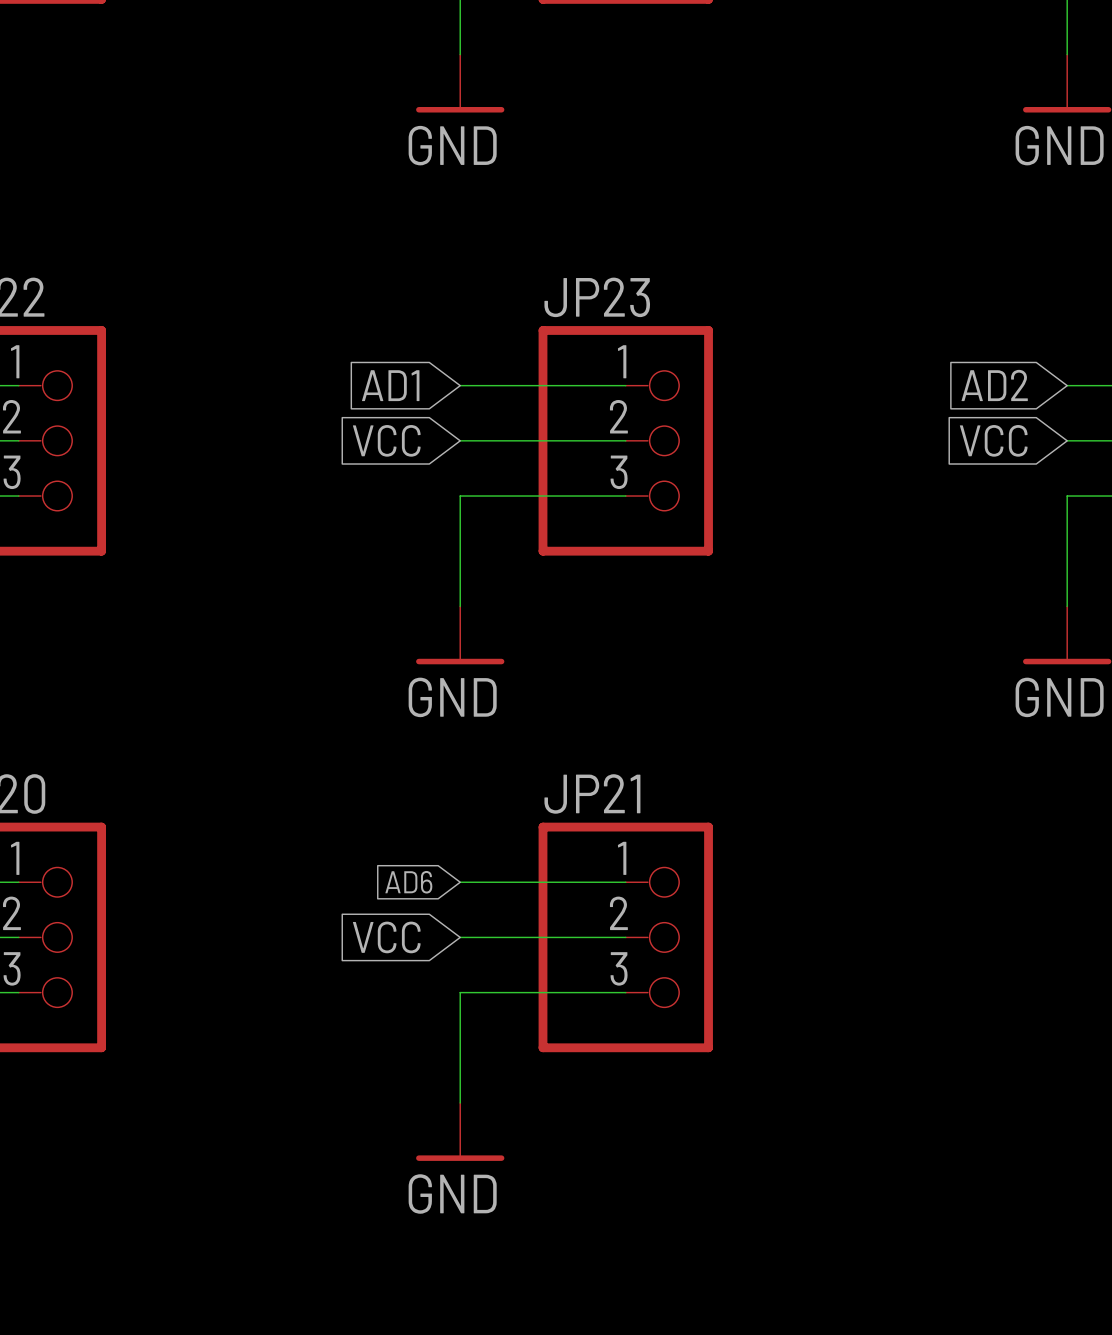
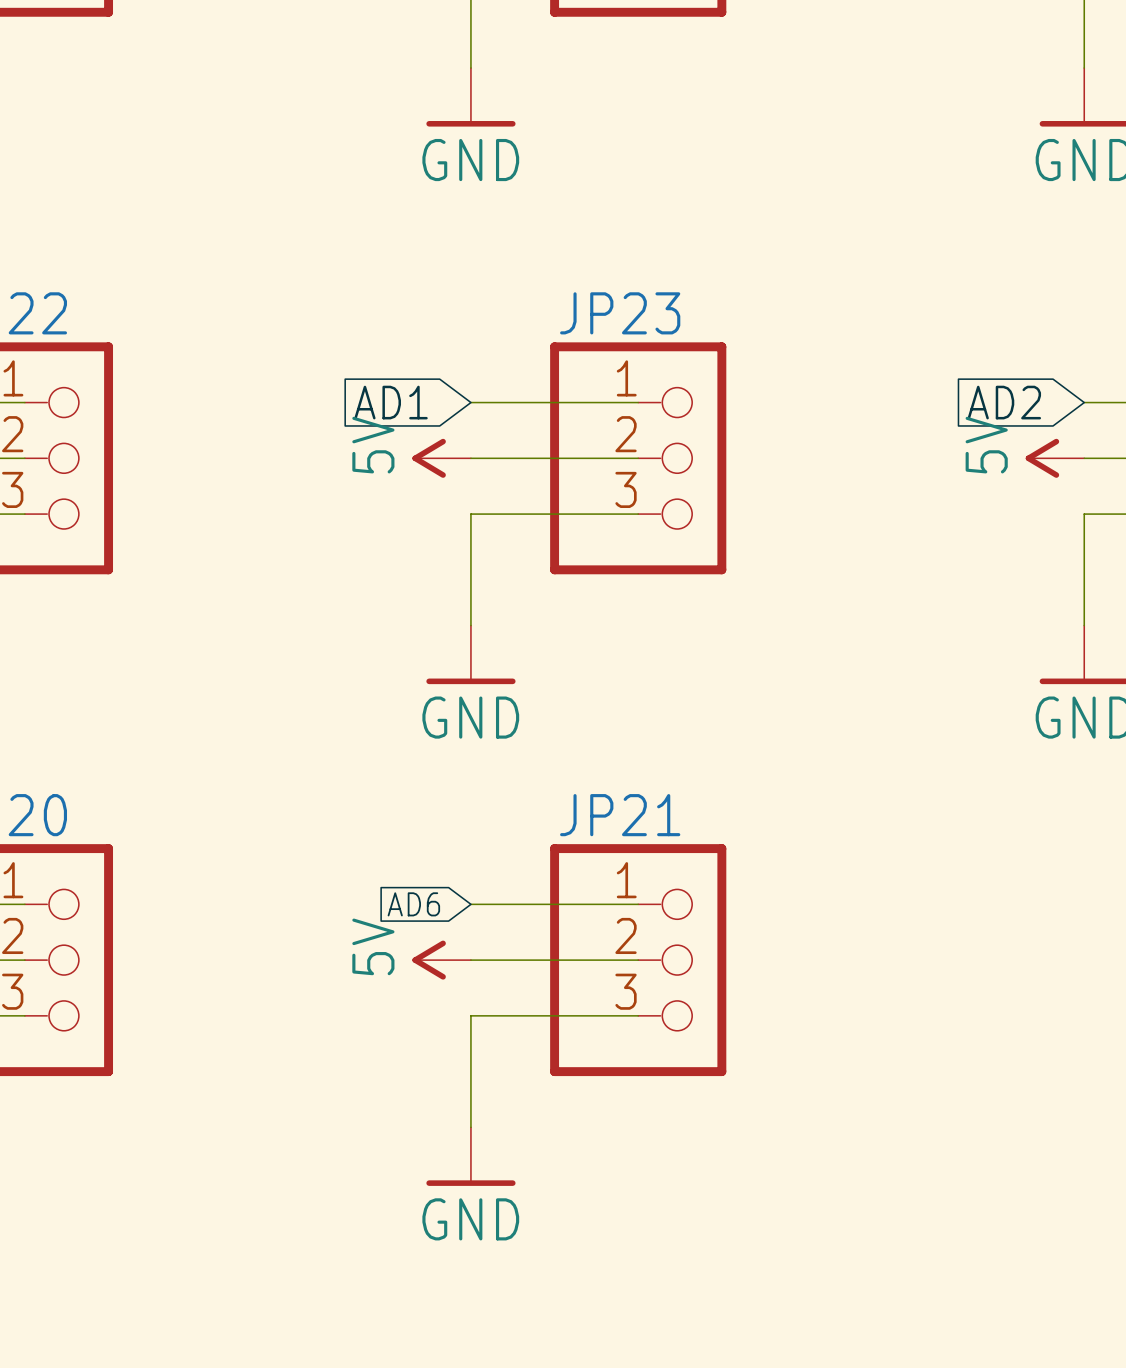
global label: VCC (386, 440) -> none
power symbol: none -> 5V (441, 458)
global label: VCC (993, 440) -> none
power symbol: none -> 5V (1054, 458)
global label: VCC (386, 937) -> none
power symbol: none -> 5V (441, 960)

